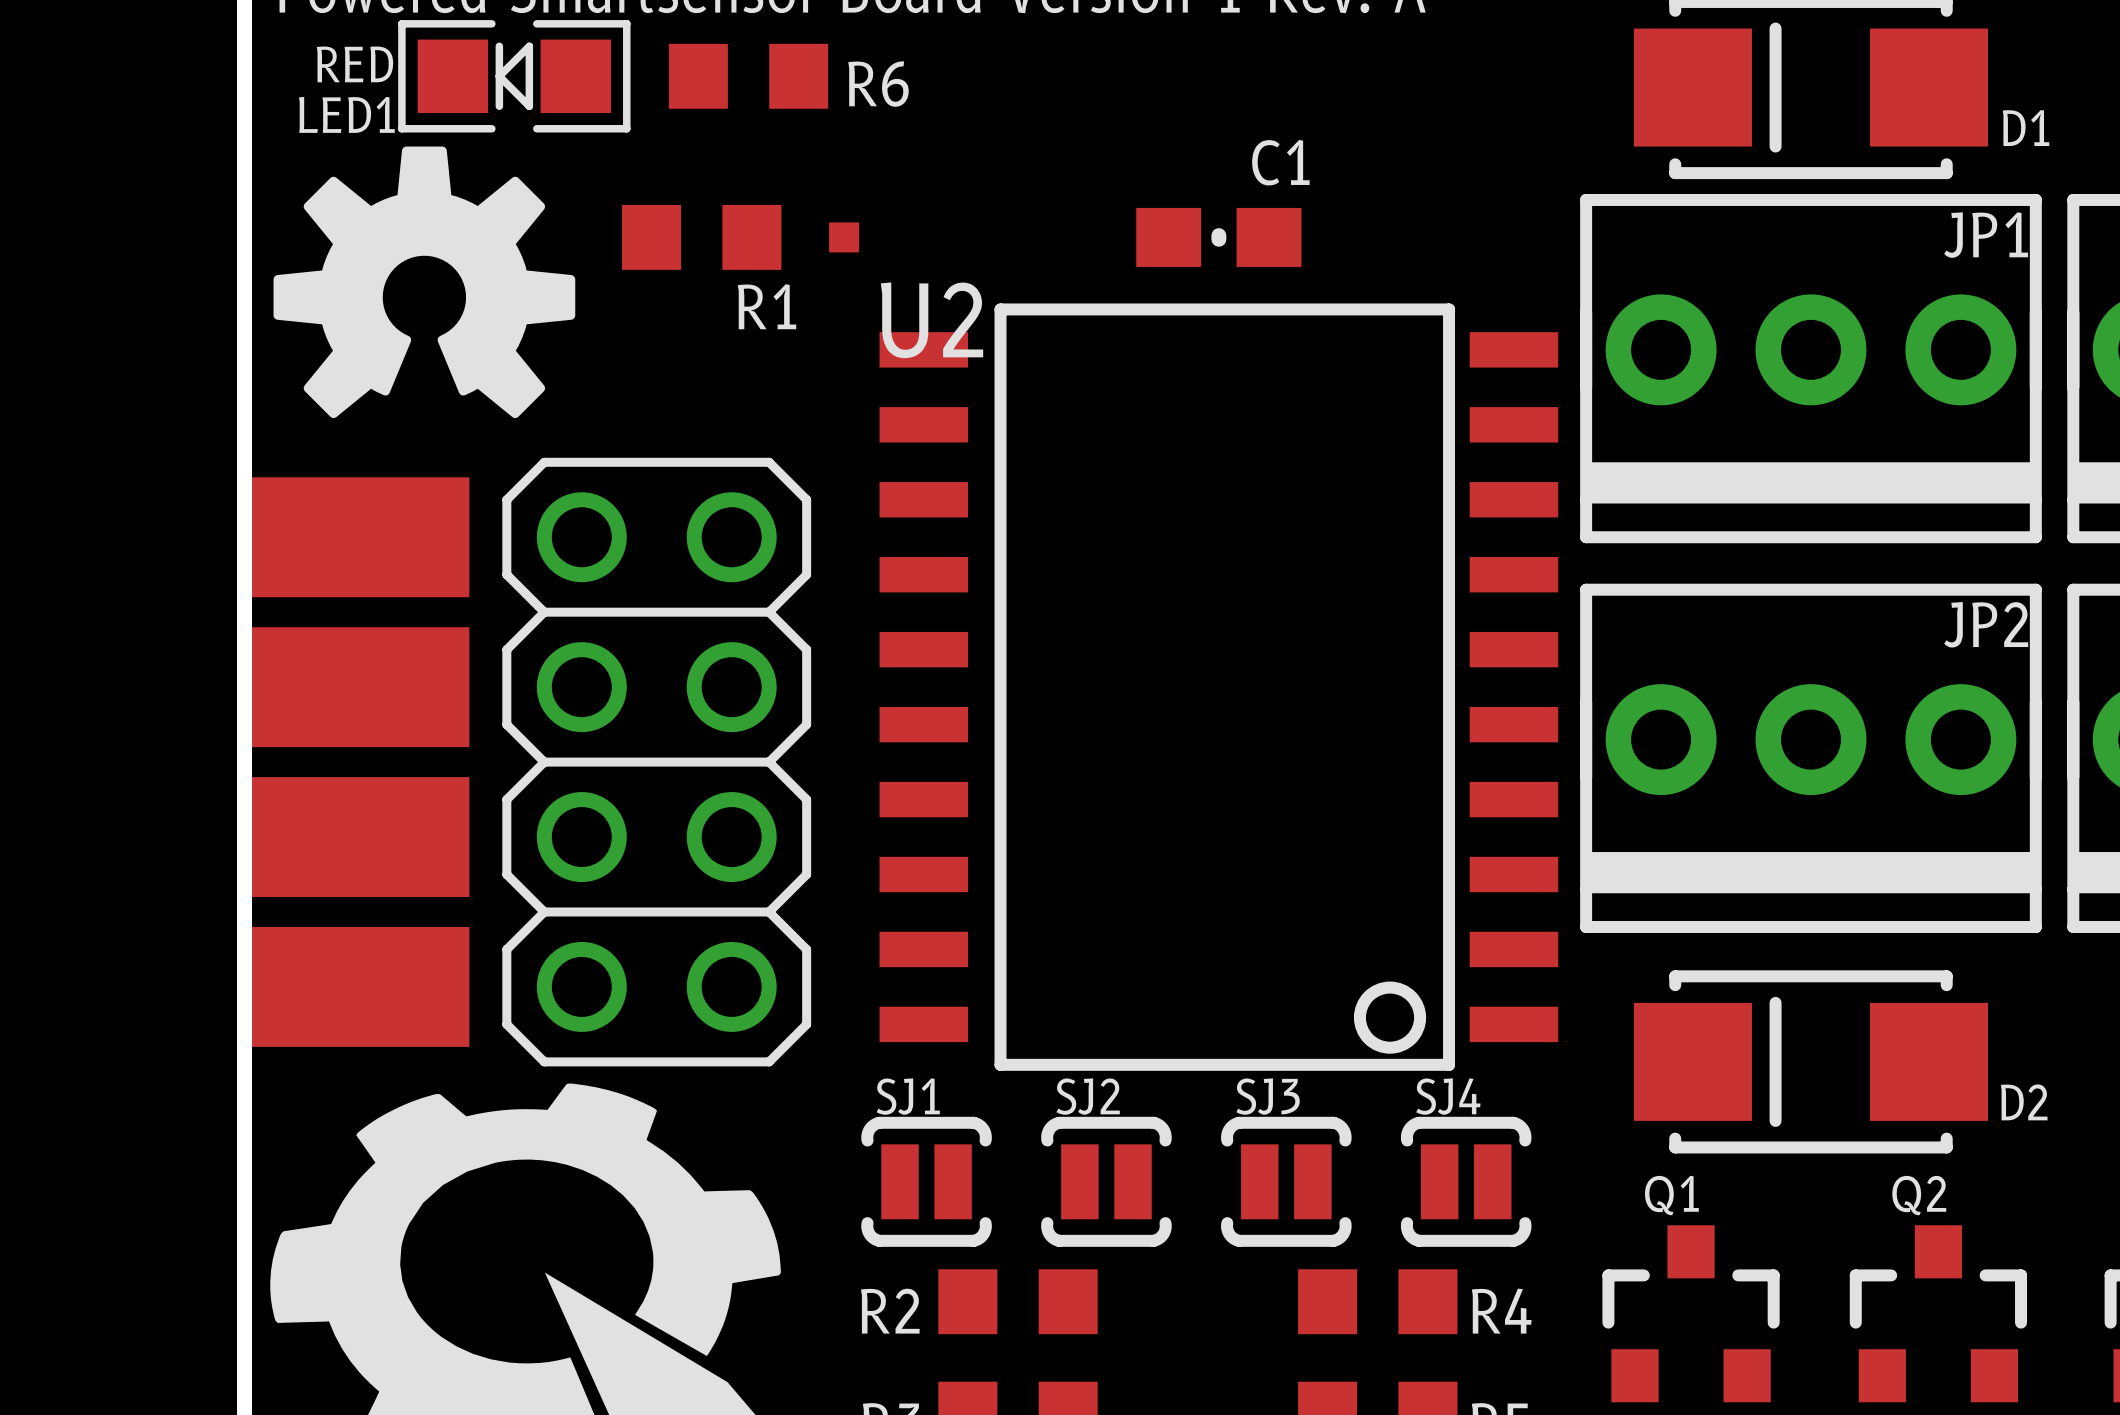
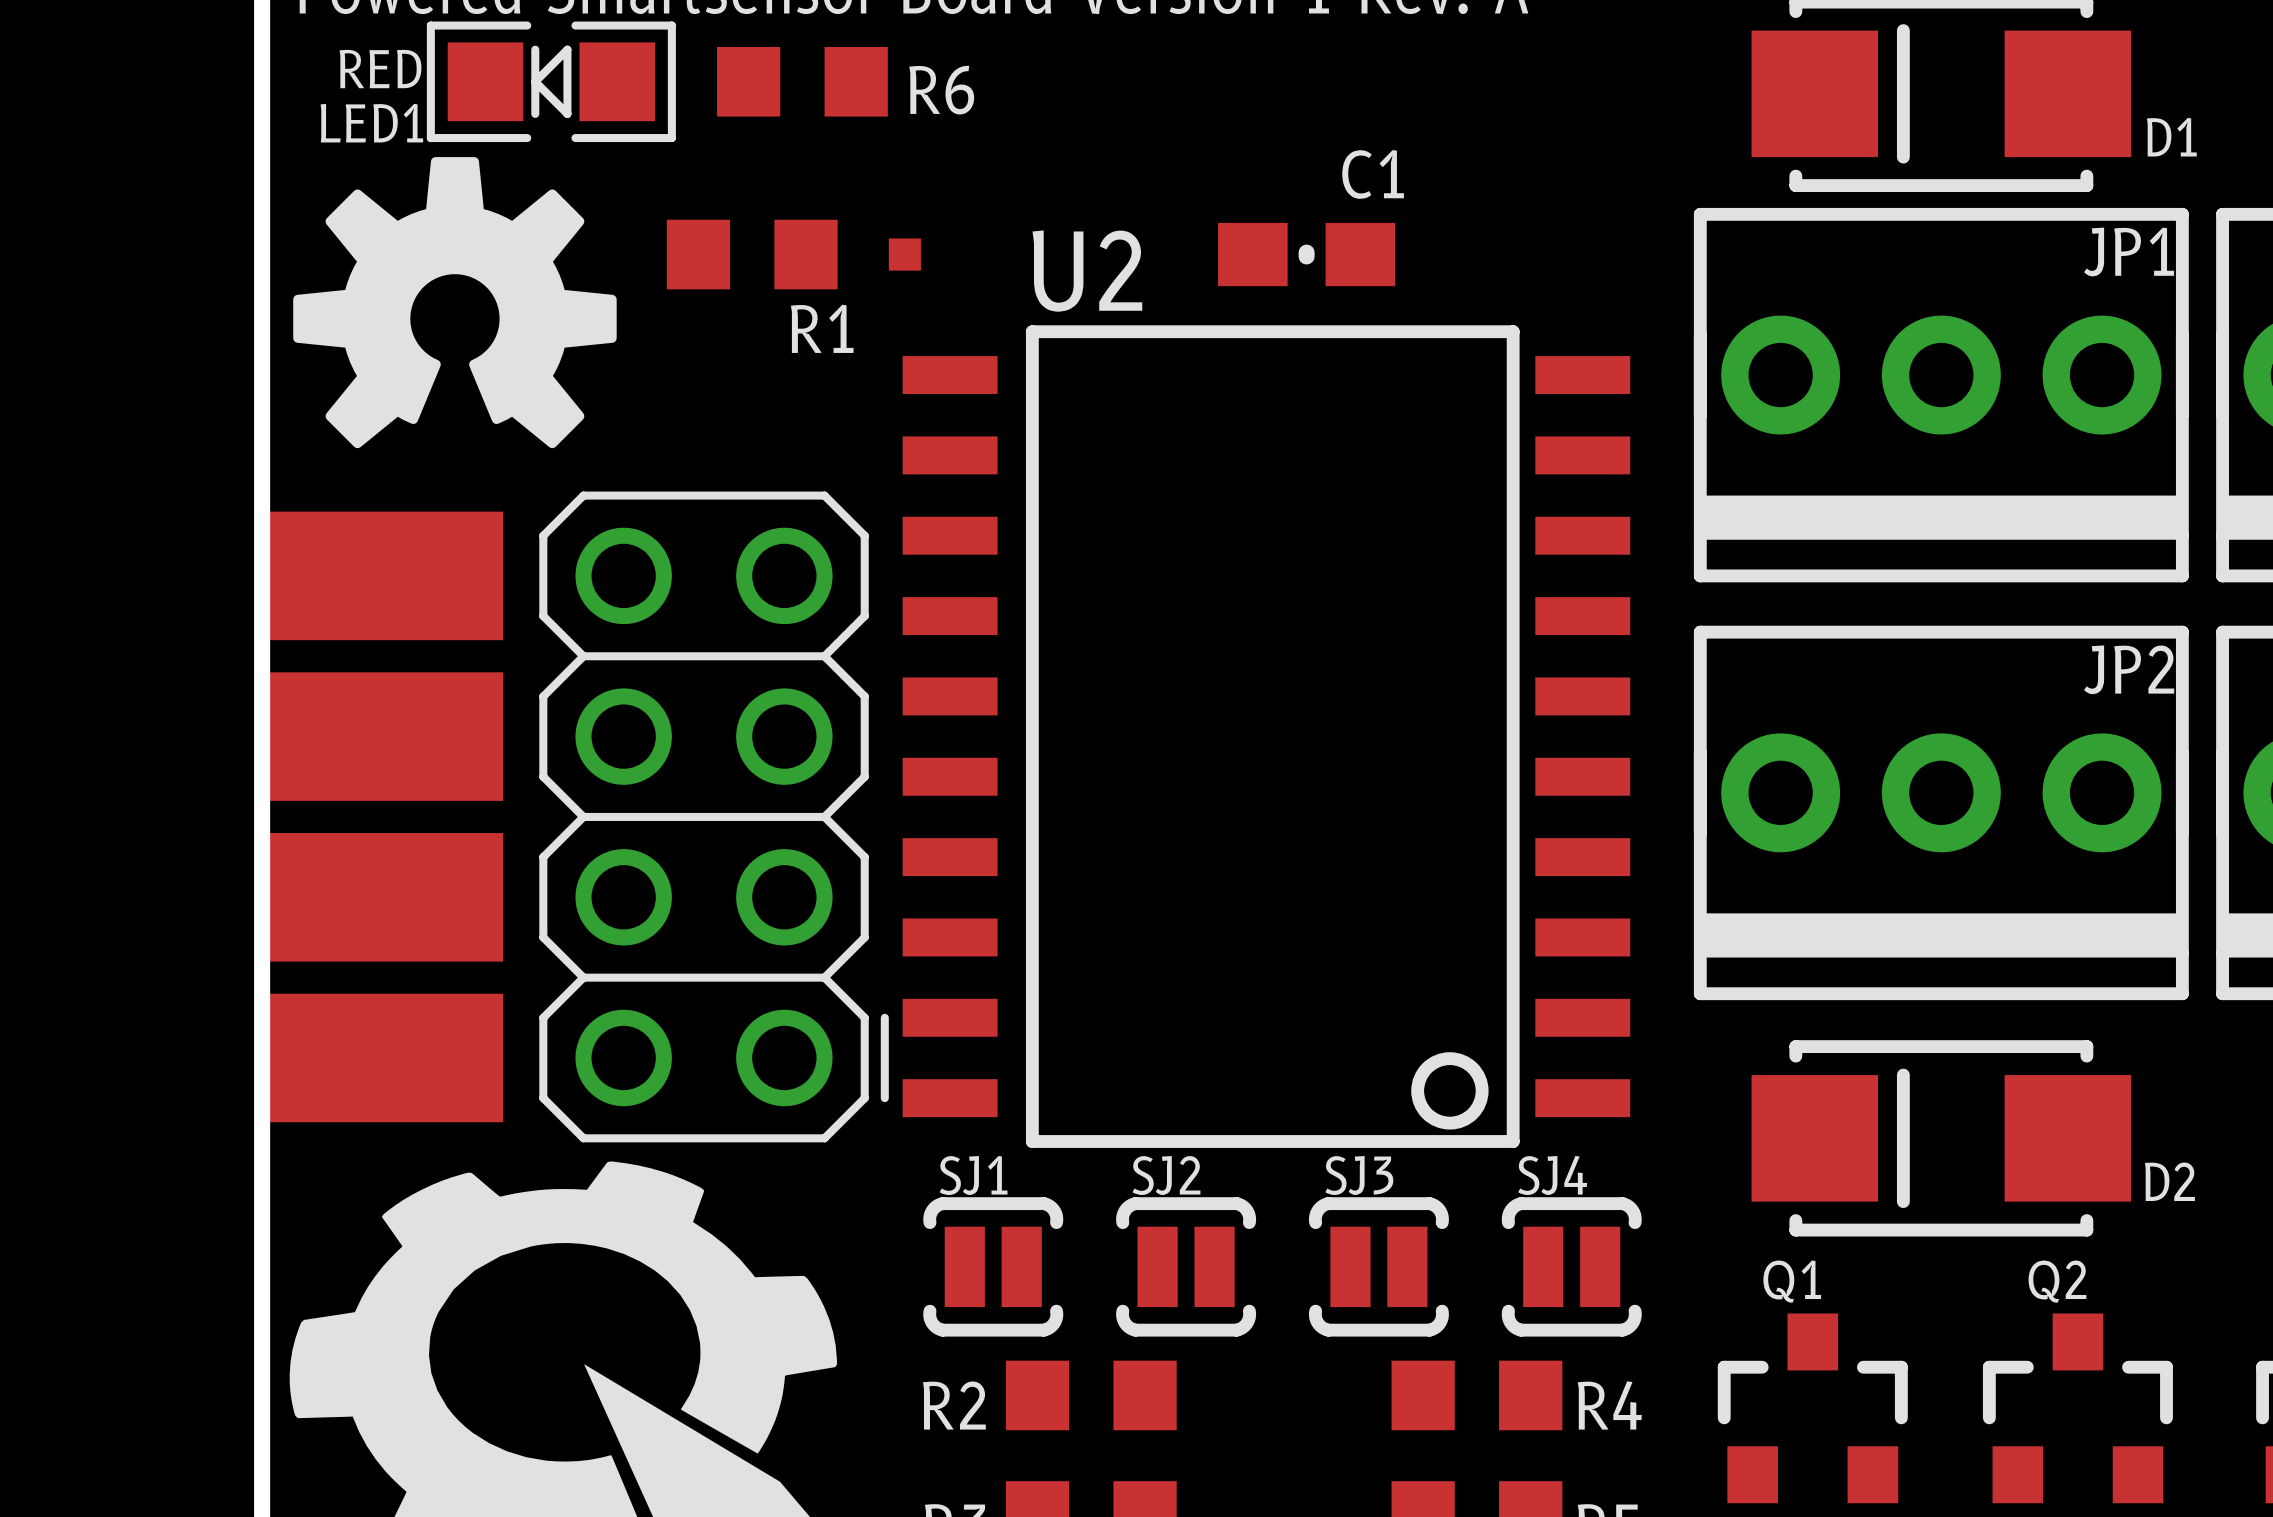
U2 name position: U2 (932, 320) -> U2 (1087, 271)
part footprint: [502, 457, 812, 1067] -> [539, 491, 889, 1143]
U2 position: (1218, 687) -> (1266, 736)

